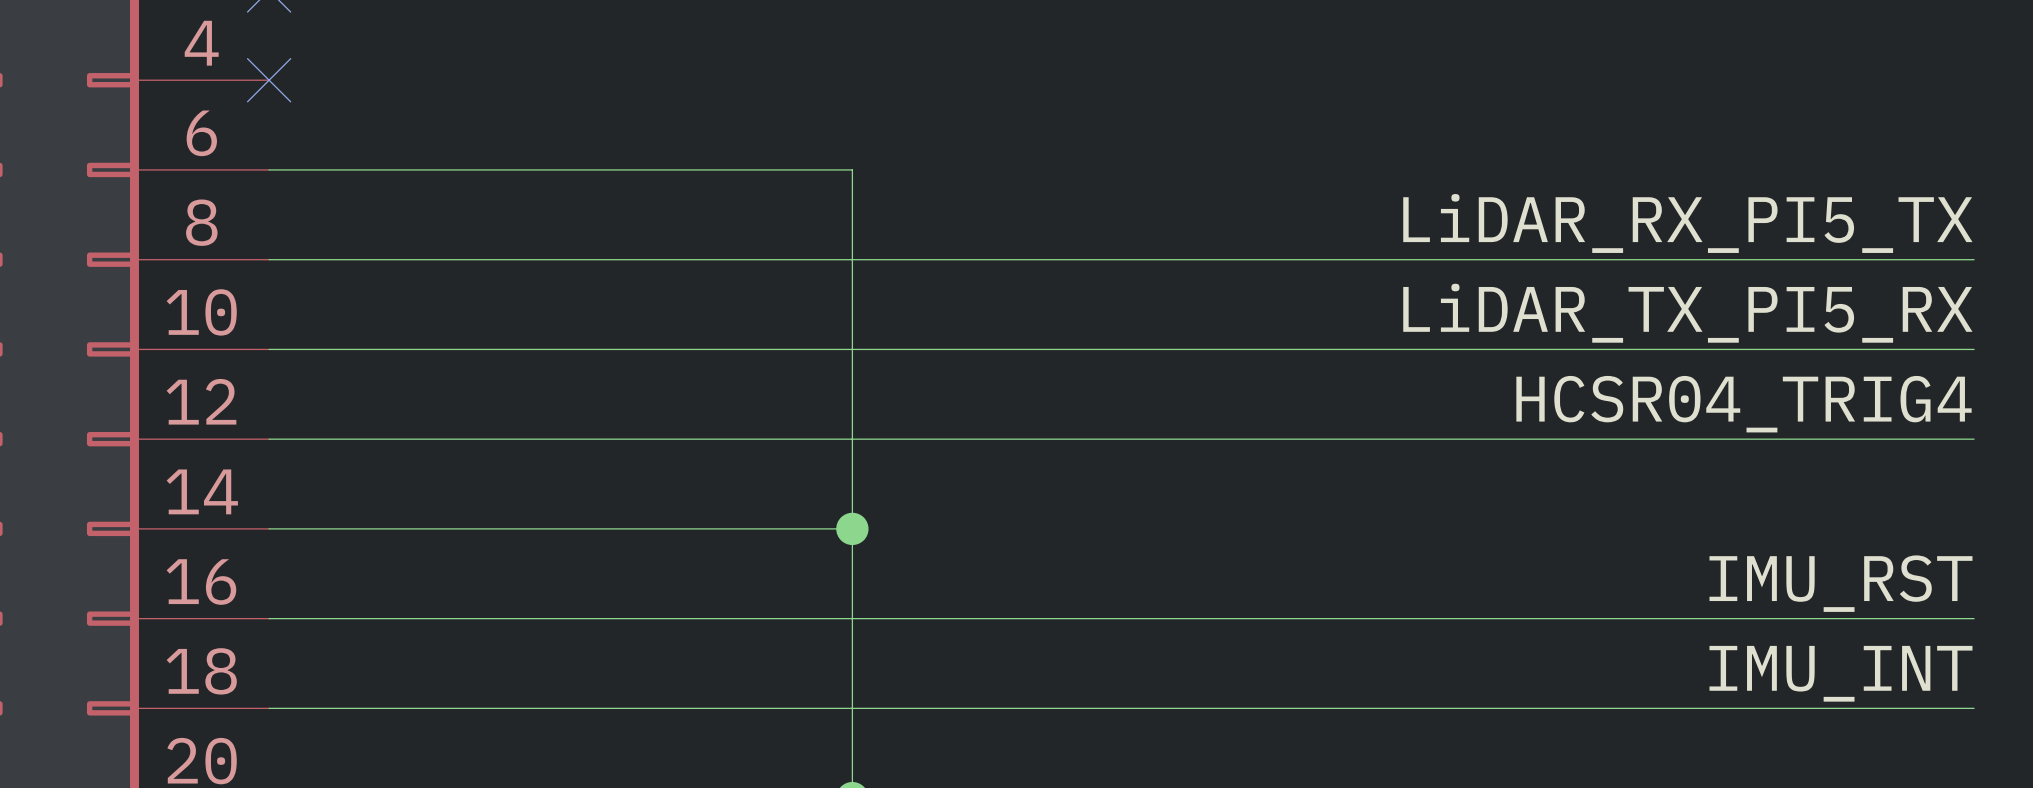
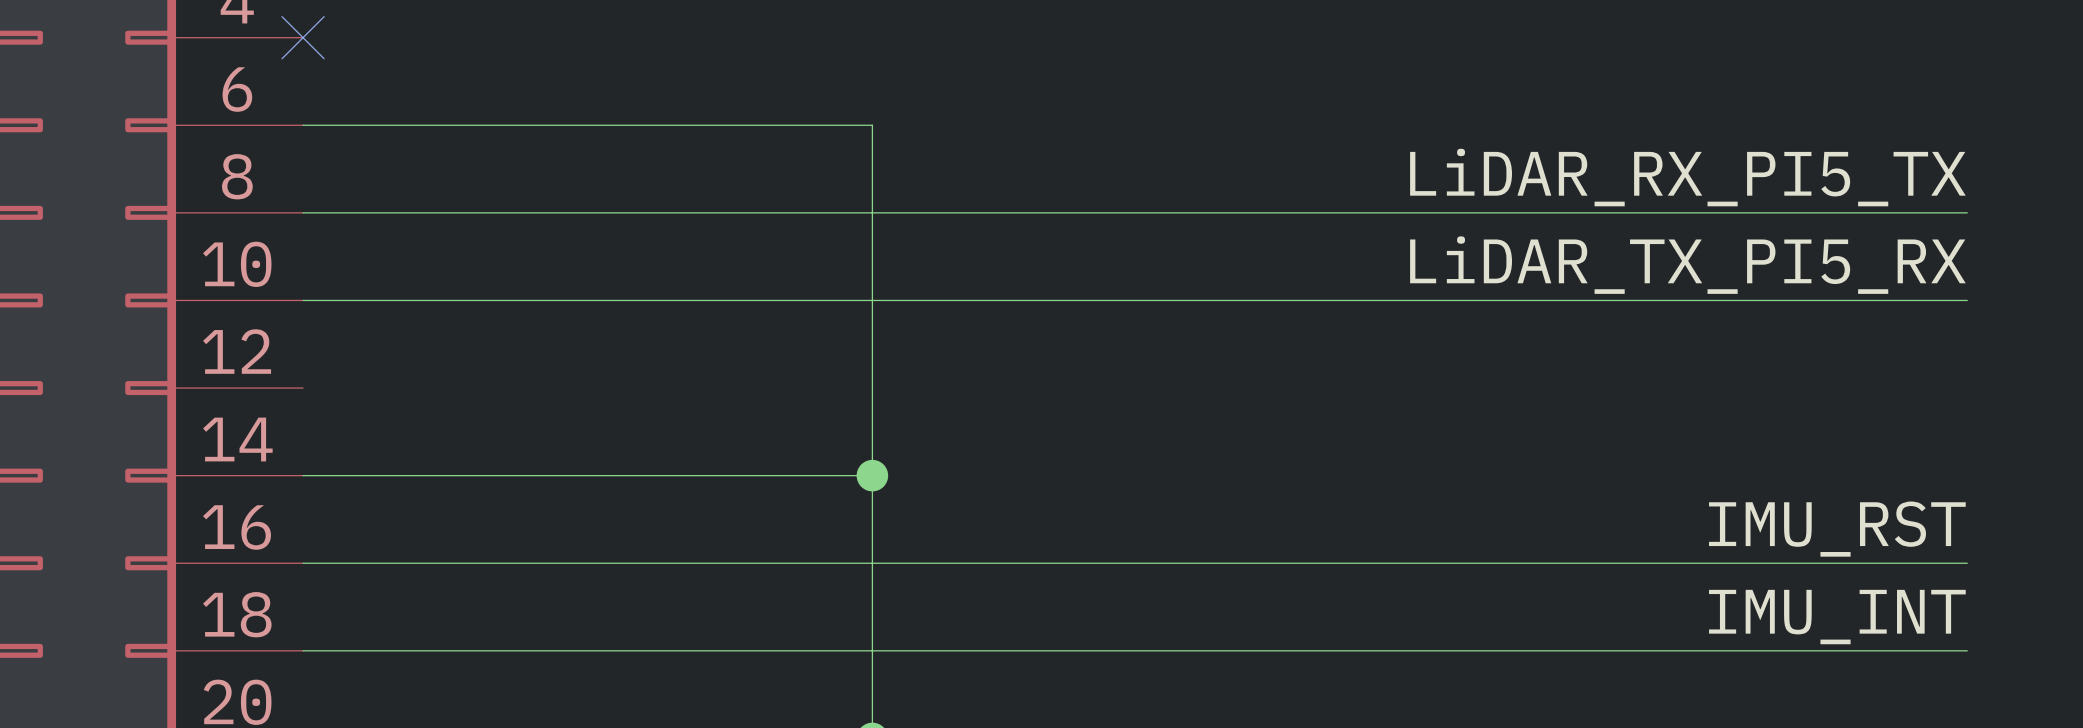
label: HCSR04_TRIG4 (1744, 404) -> none
wire: (269, 439) (1974, 439) -> none

